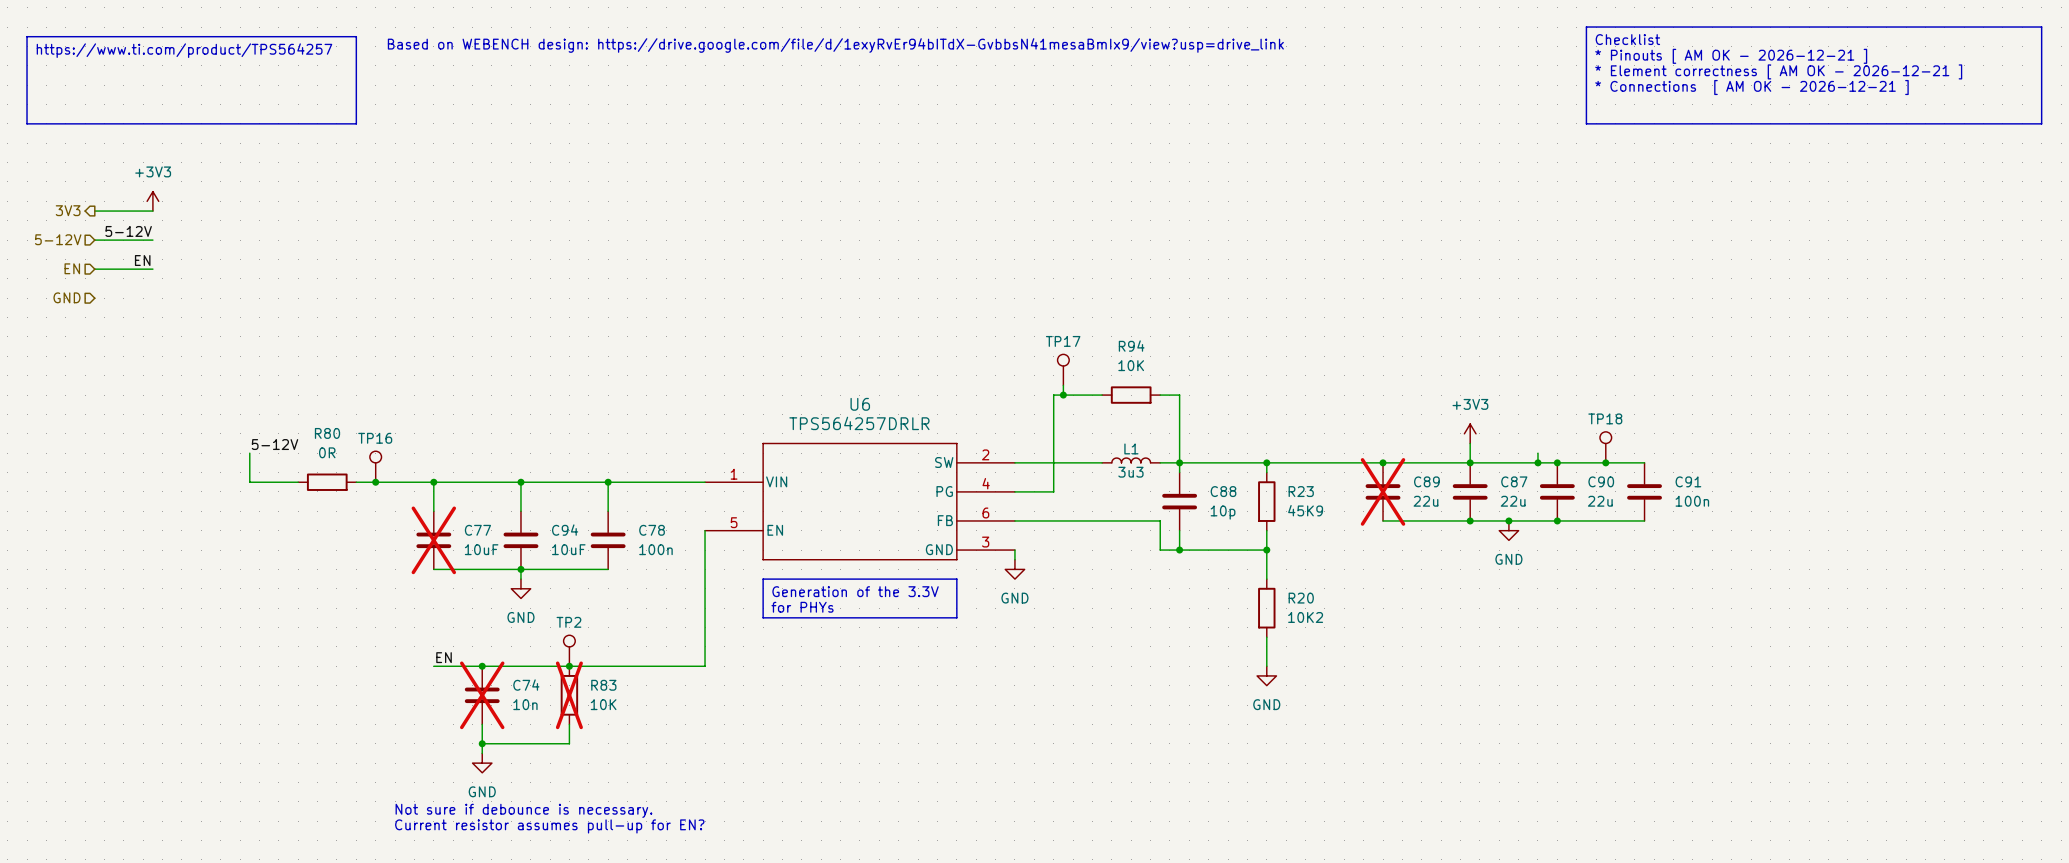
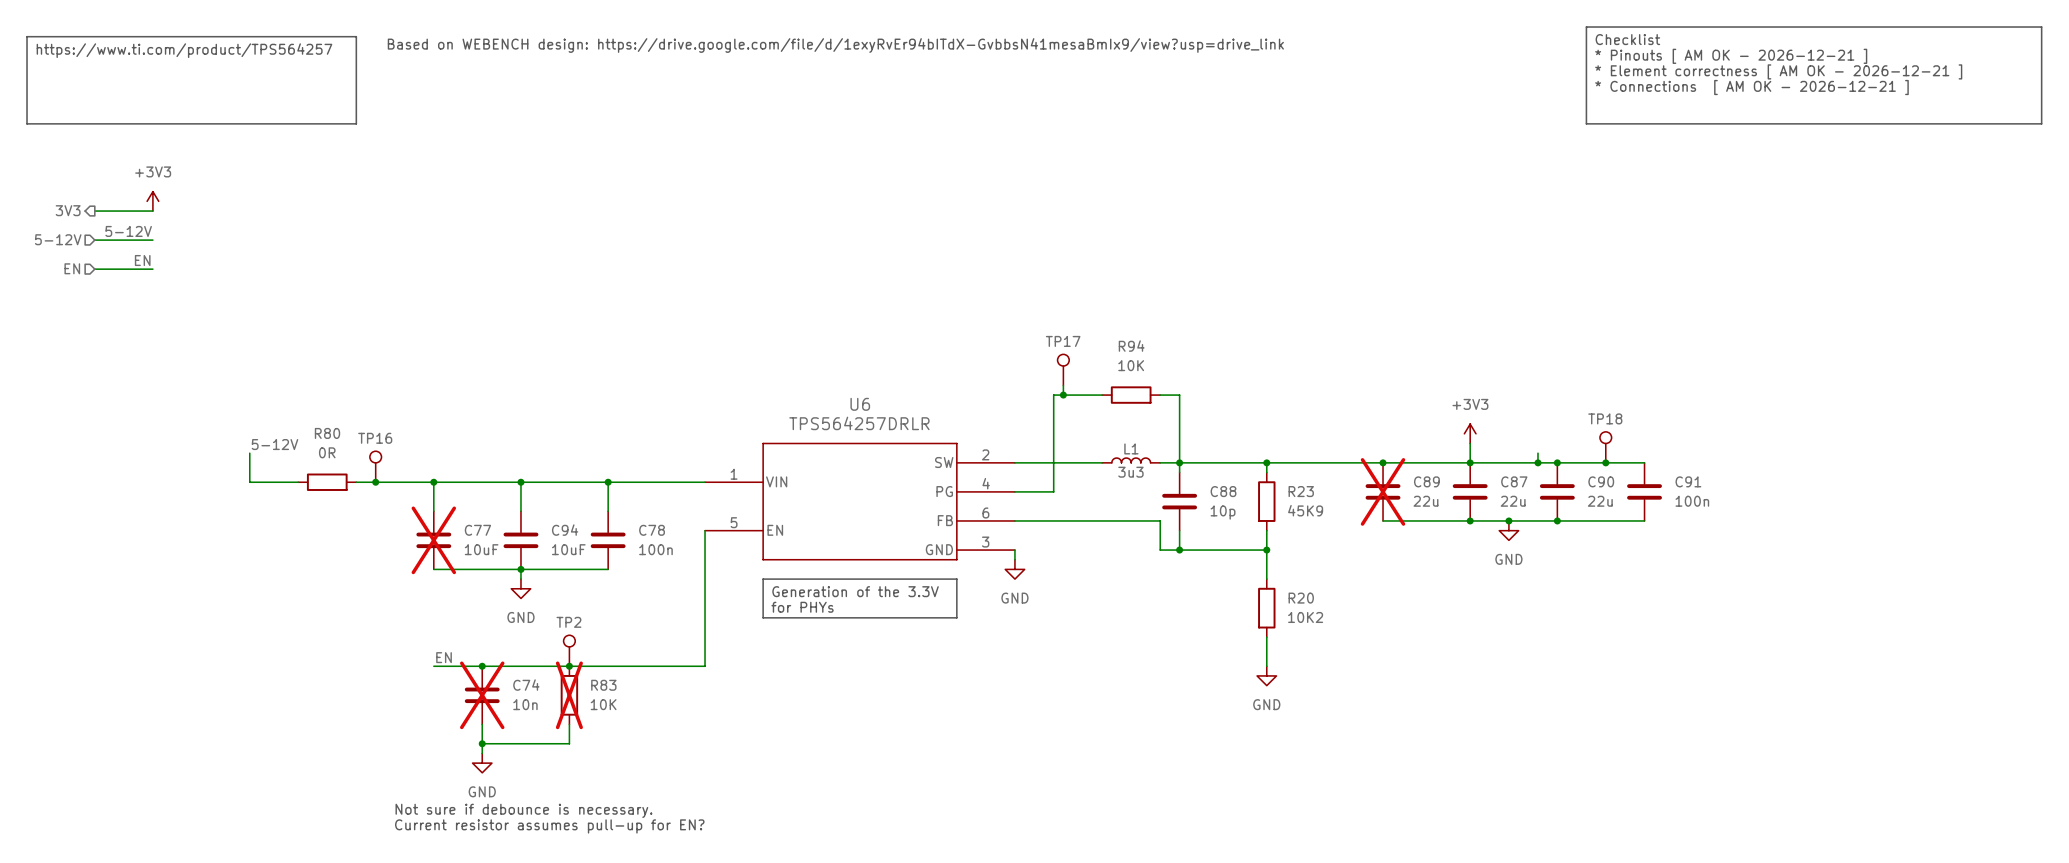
hierarchical label: GND (66, 297) -> none

